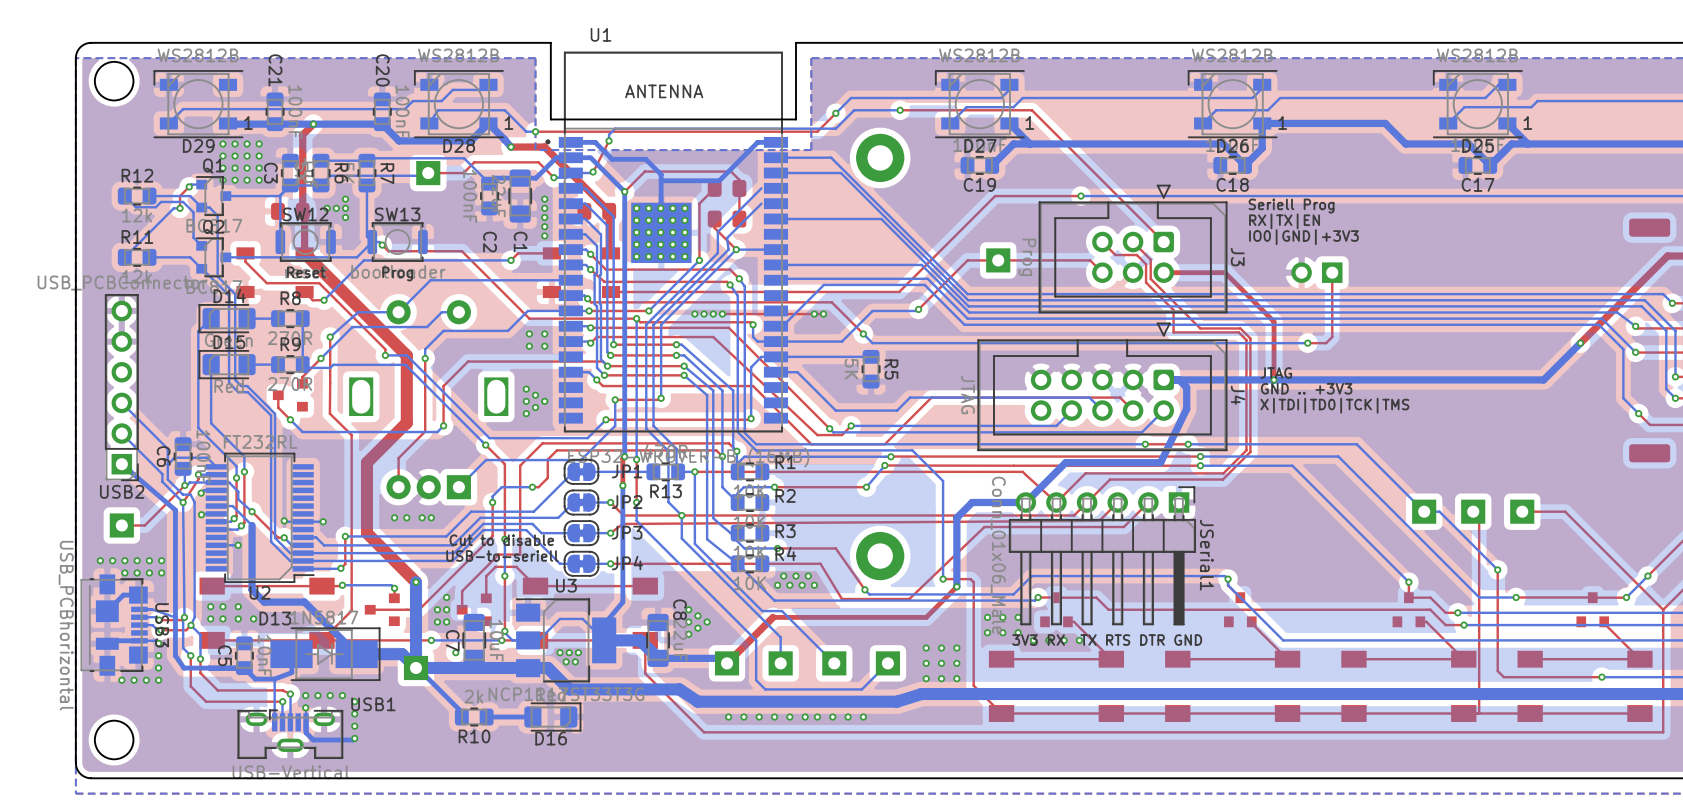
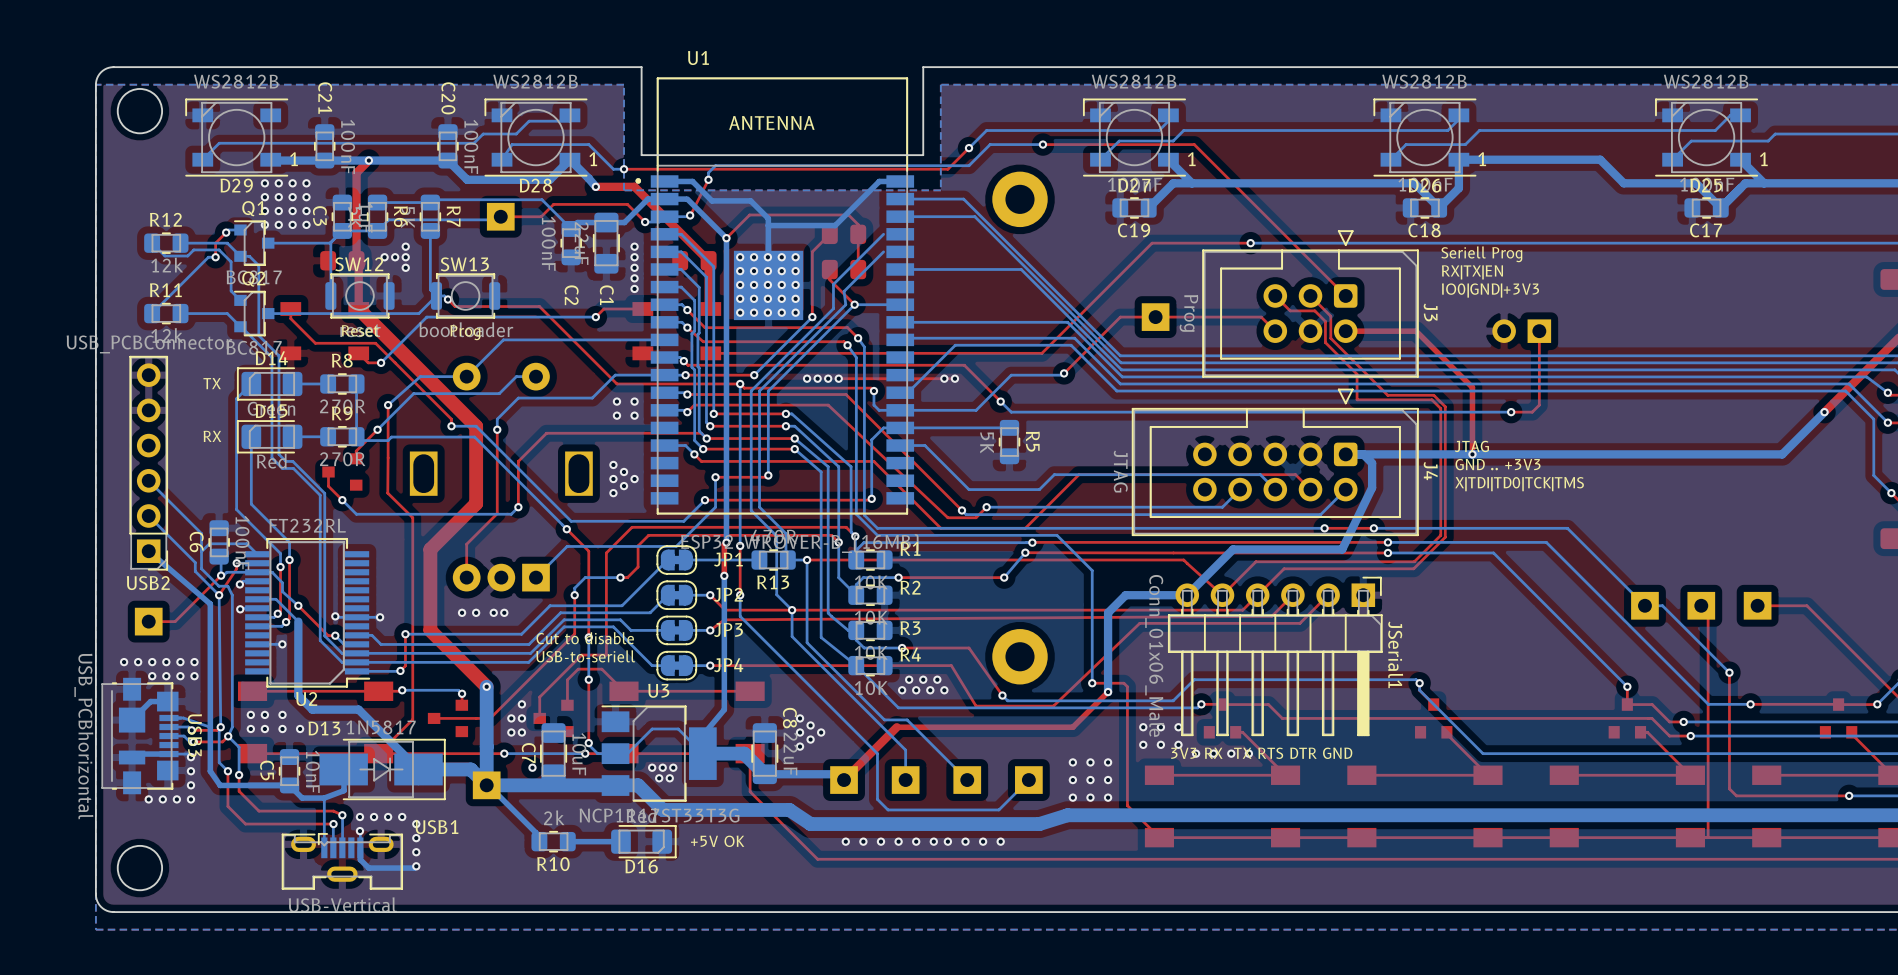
text: none -> TX (212, 383)
text: none -> RX (212, 436)
text: none -> +5V OK (717, 841)

